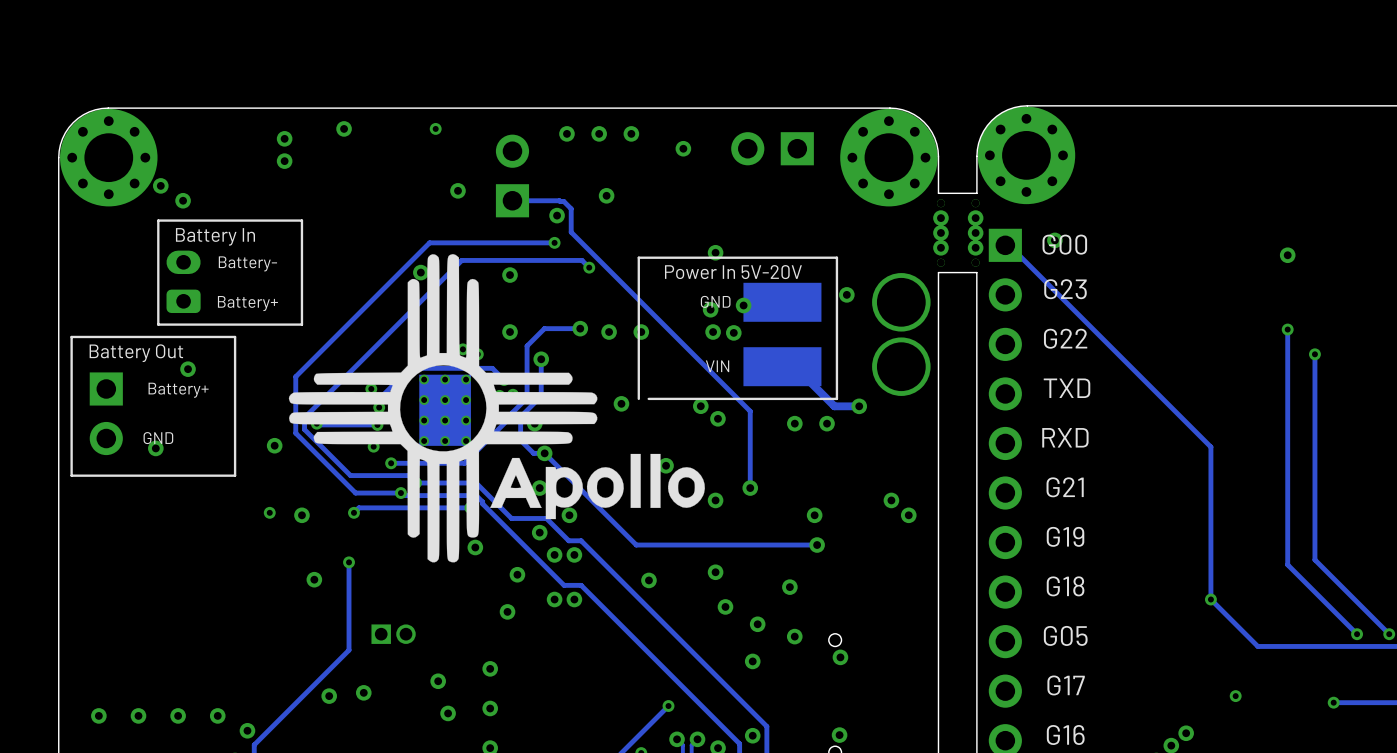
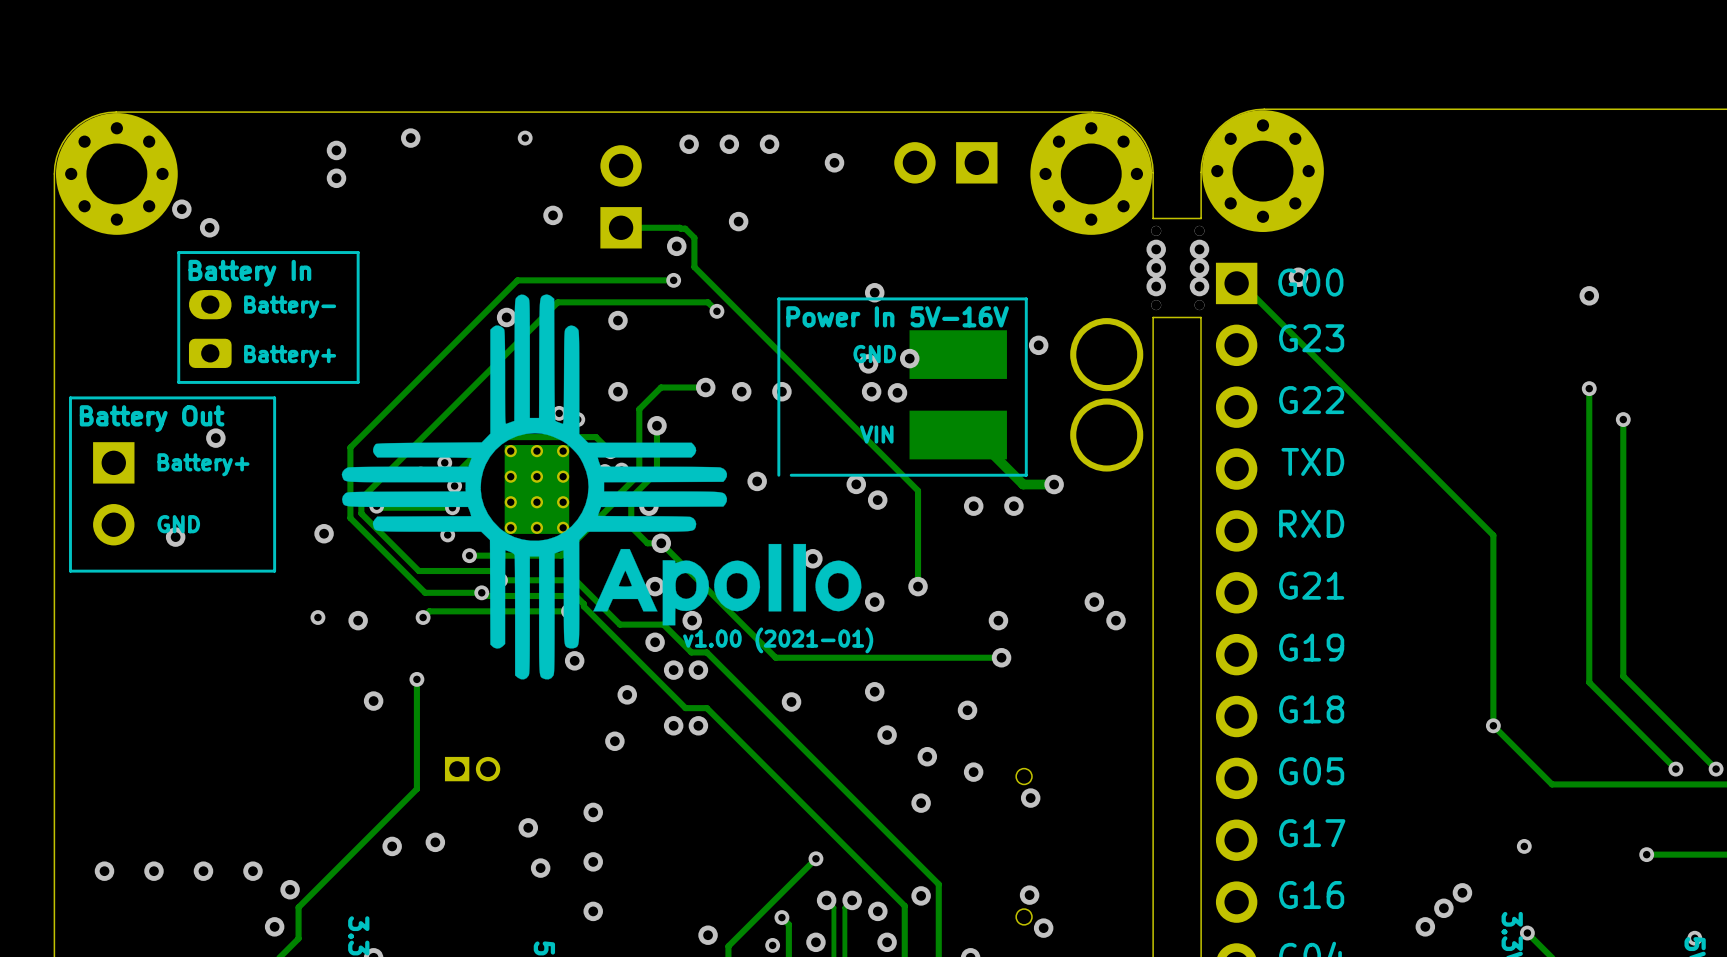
text: Power In 5V-20V (733, 272) -> Power In 5V-16V (897, 316)
text: none -> v1.00 (2021-01) (778, 640)

